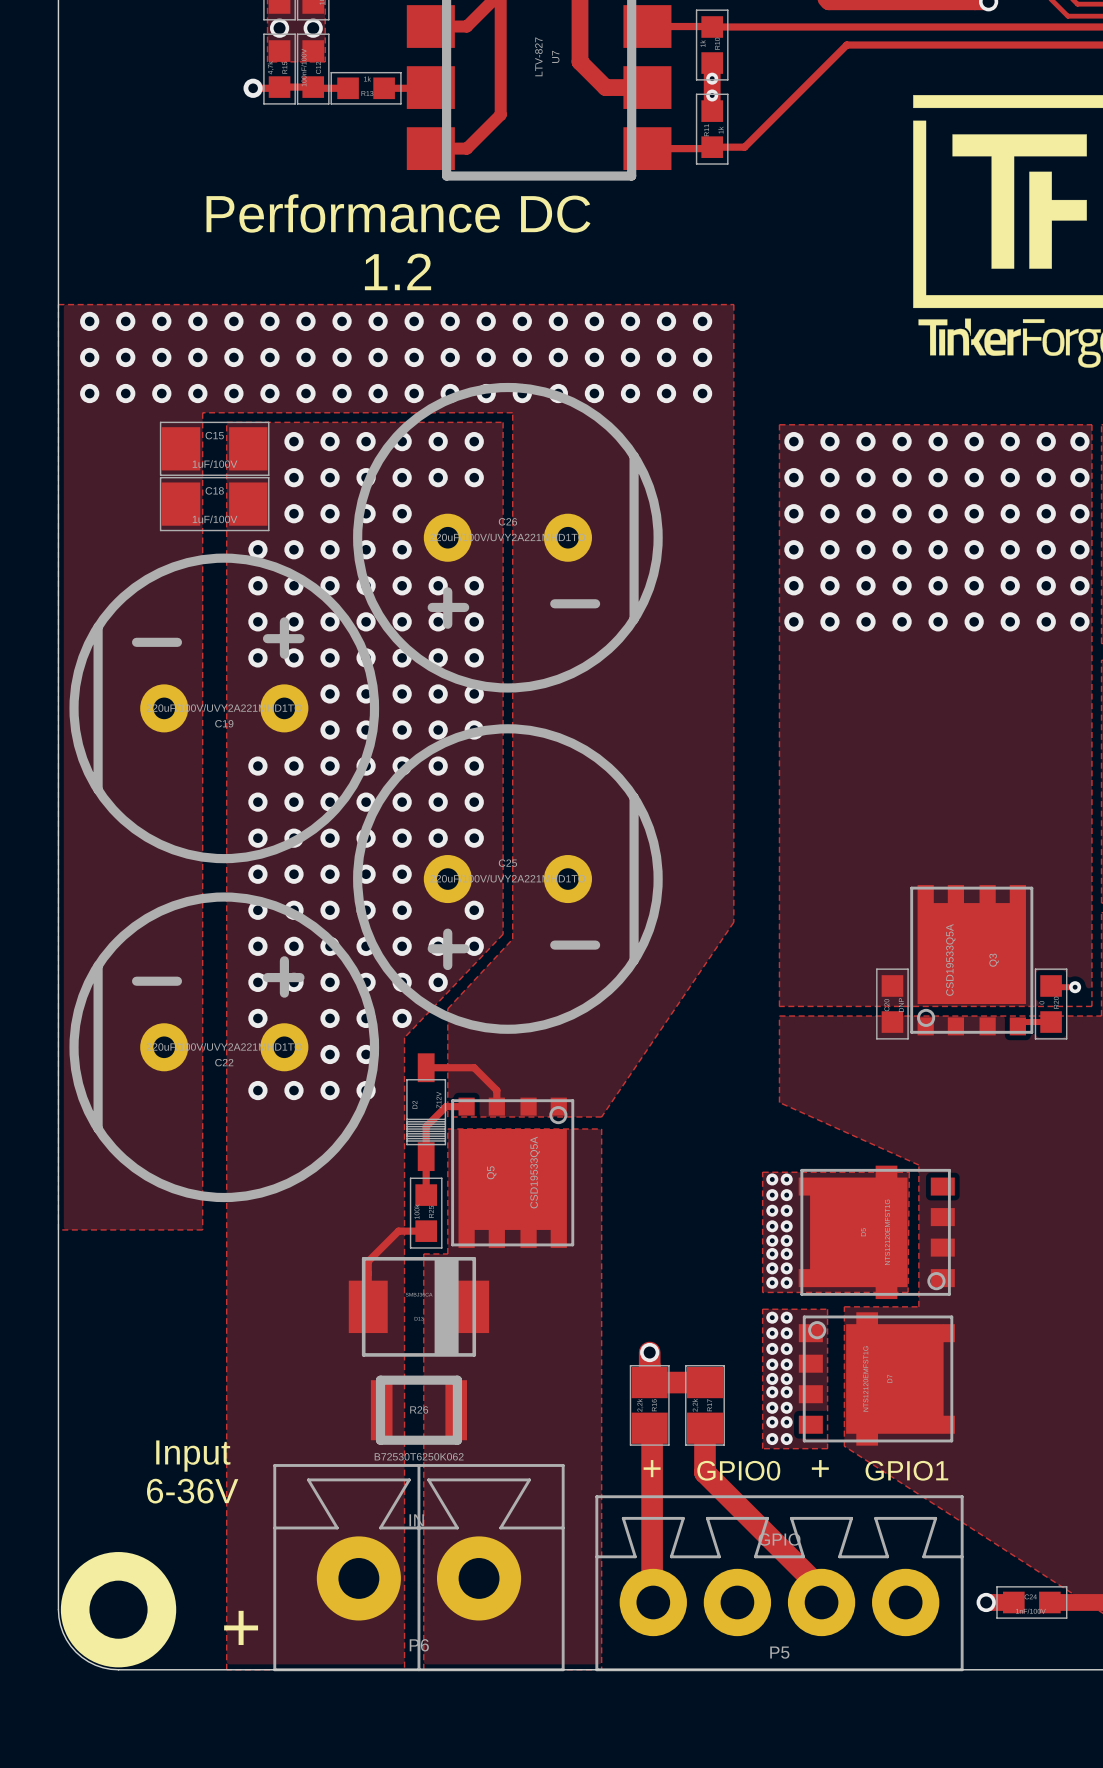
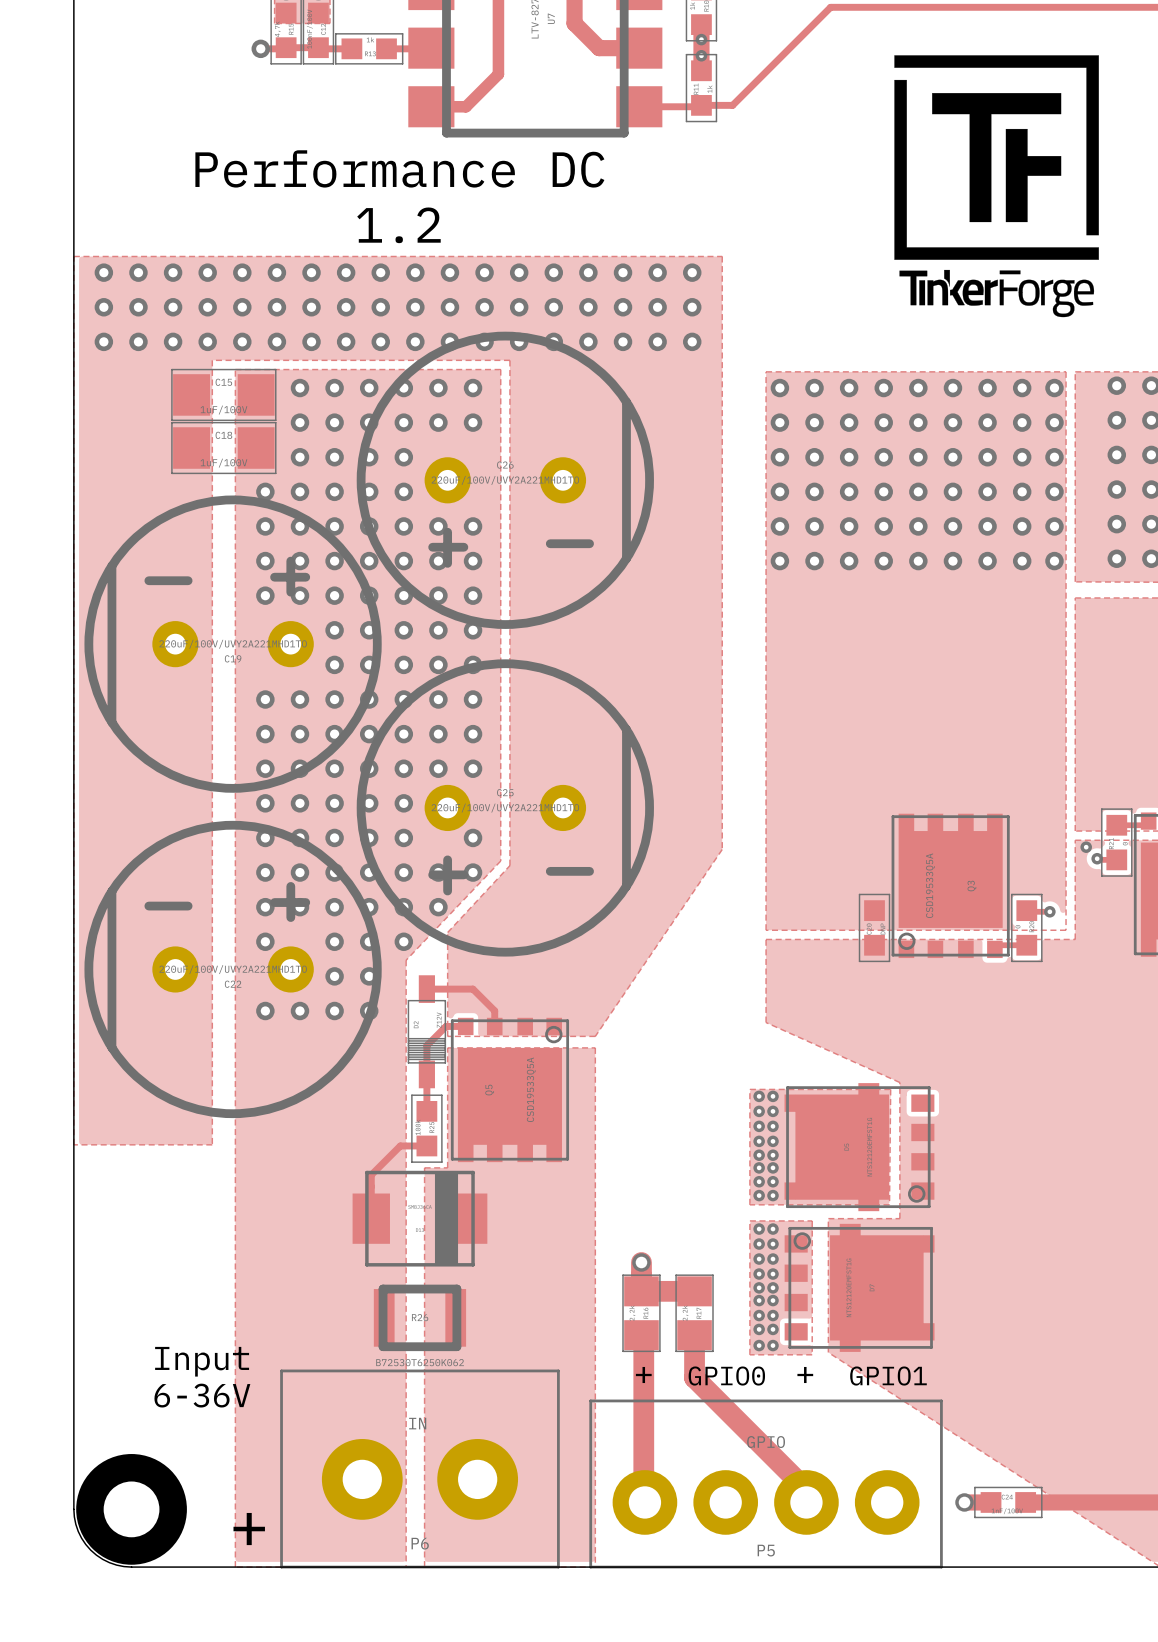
P6 footprint: [273, 1464, 565, 1672] -> [280, 1369, 560, 1569]
P5 footprint: [595, 1495, 964, 1672] -> [589, 1399, 943, 1569]

